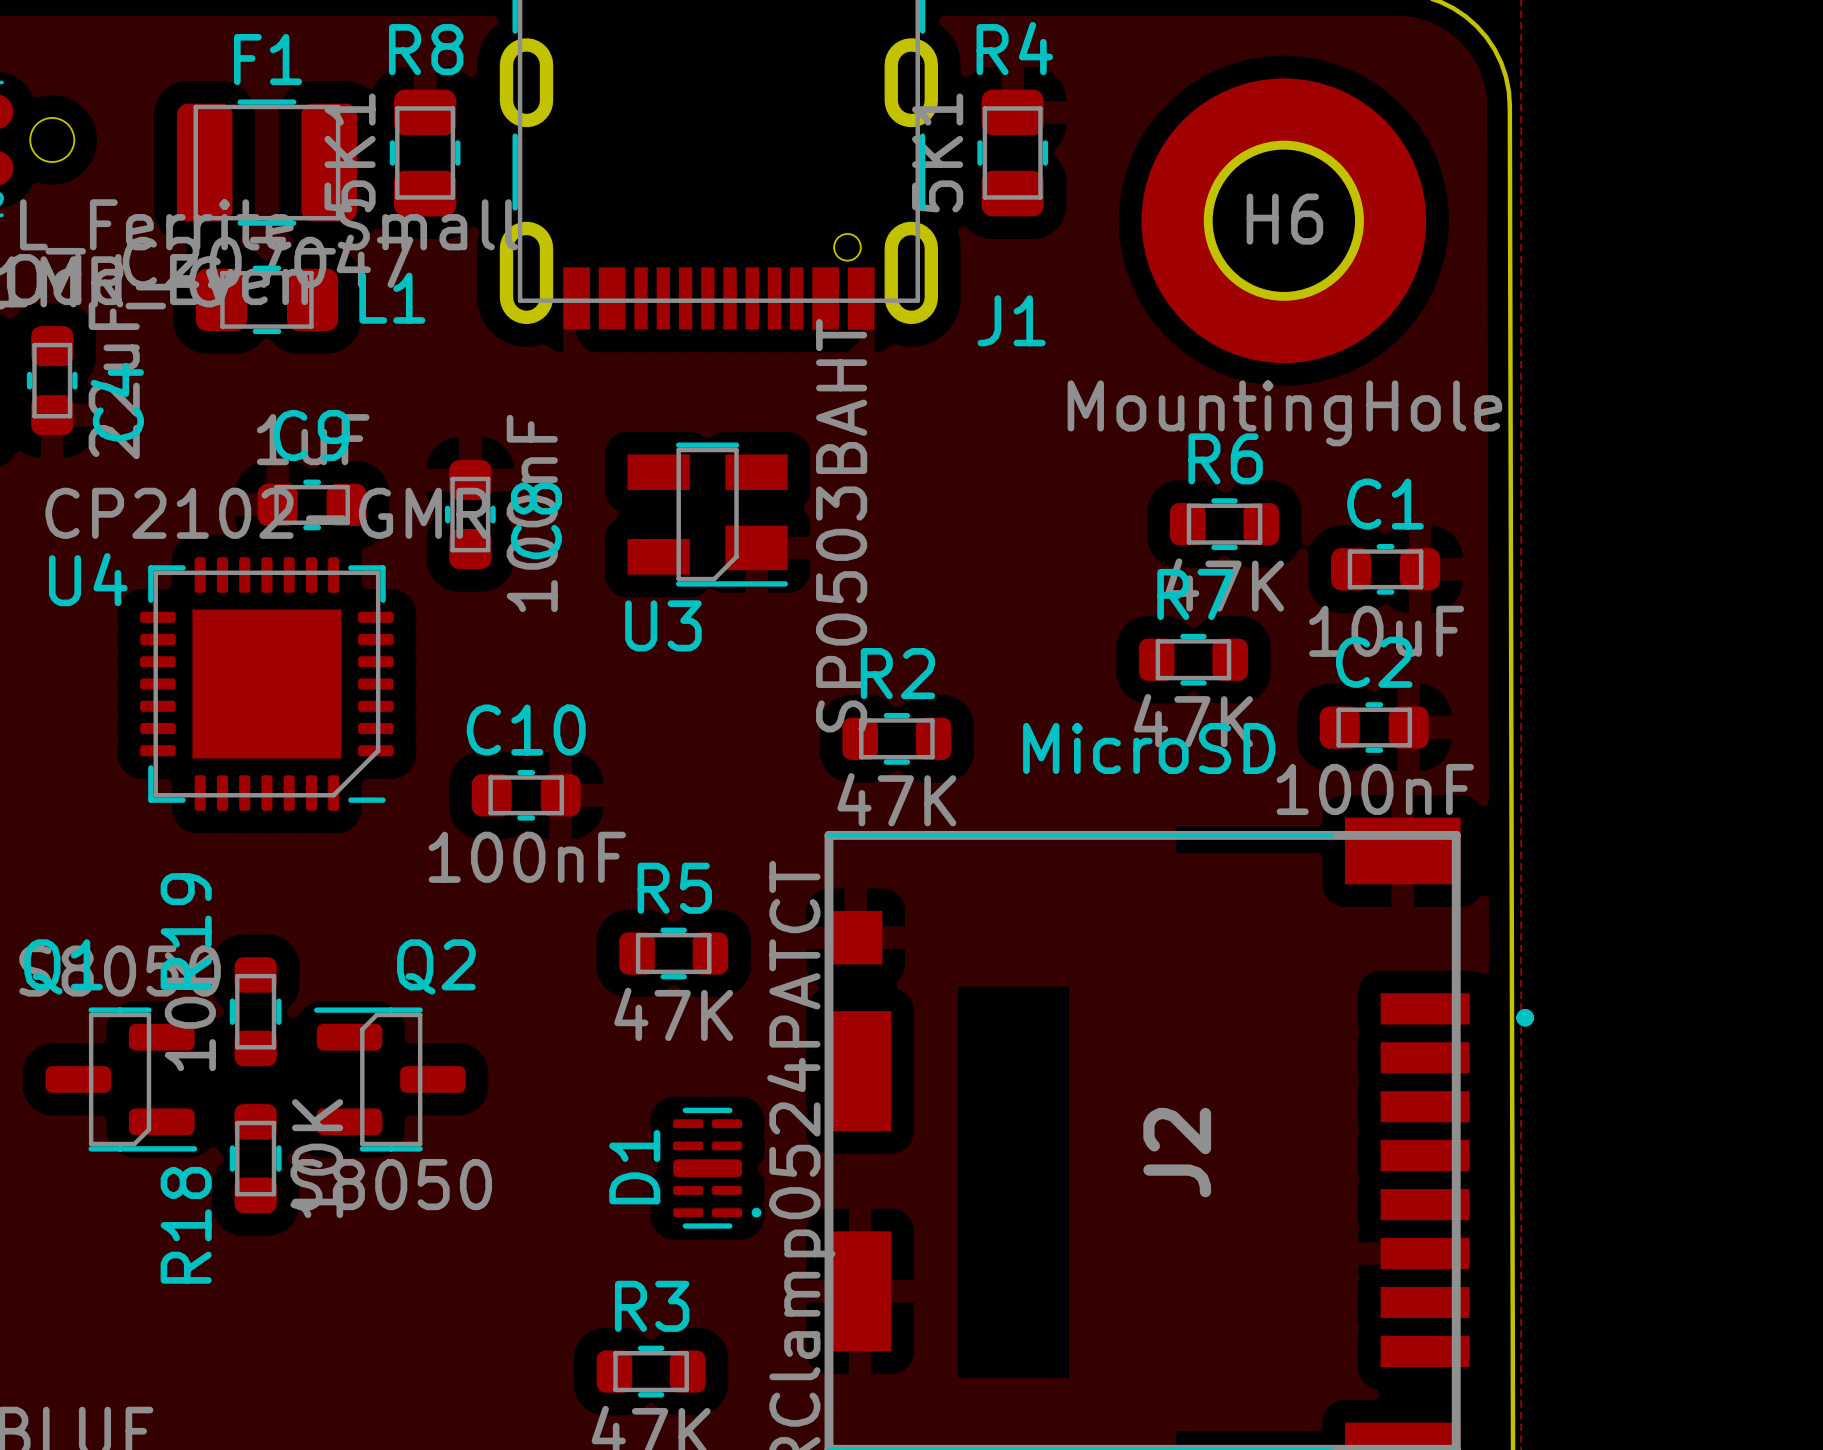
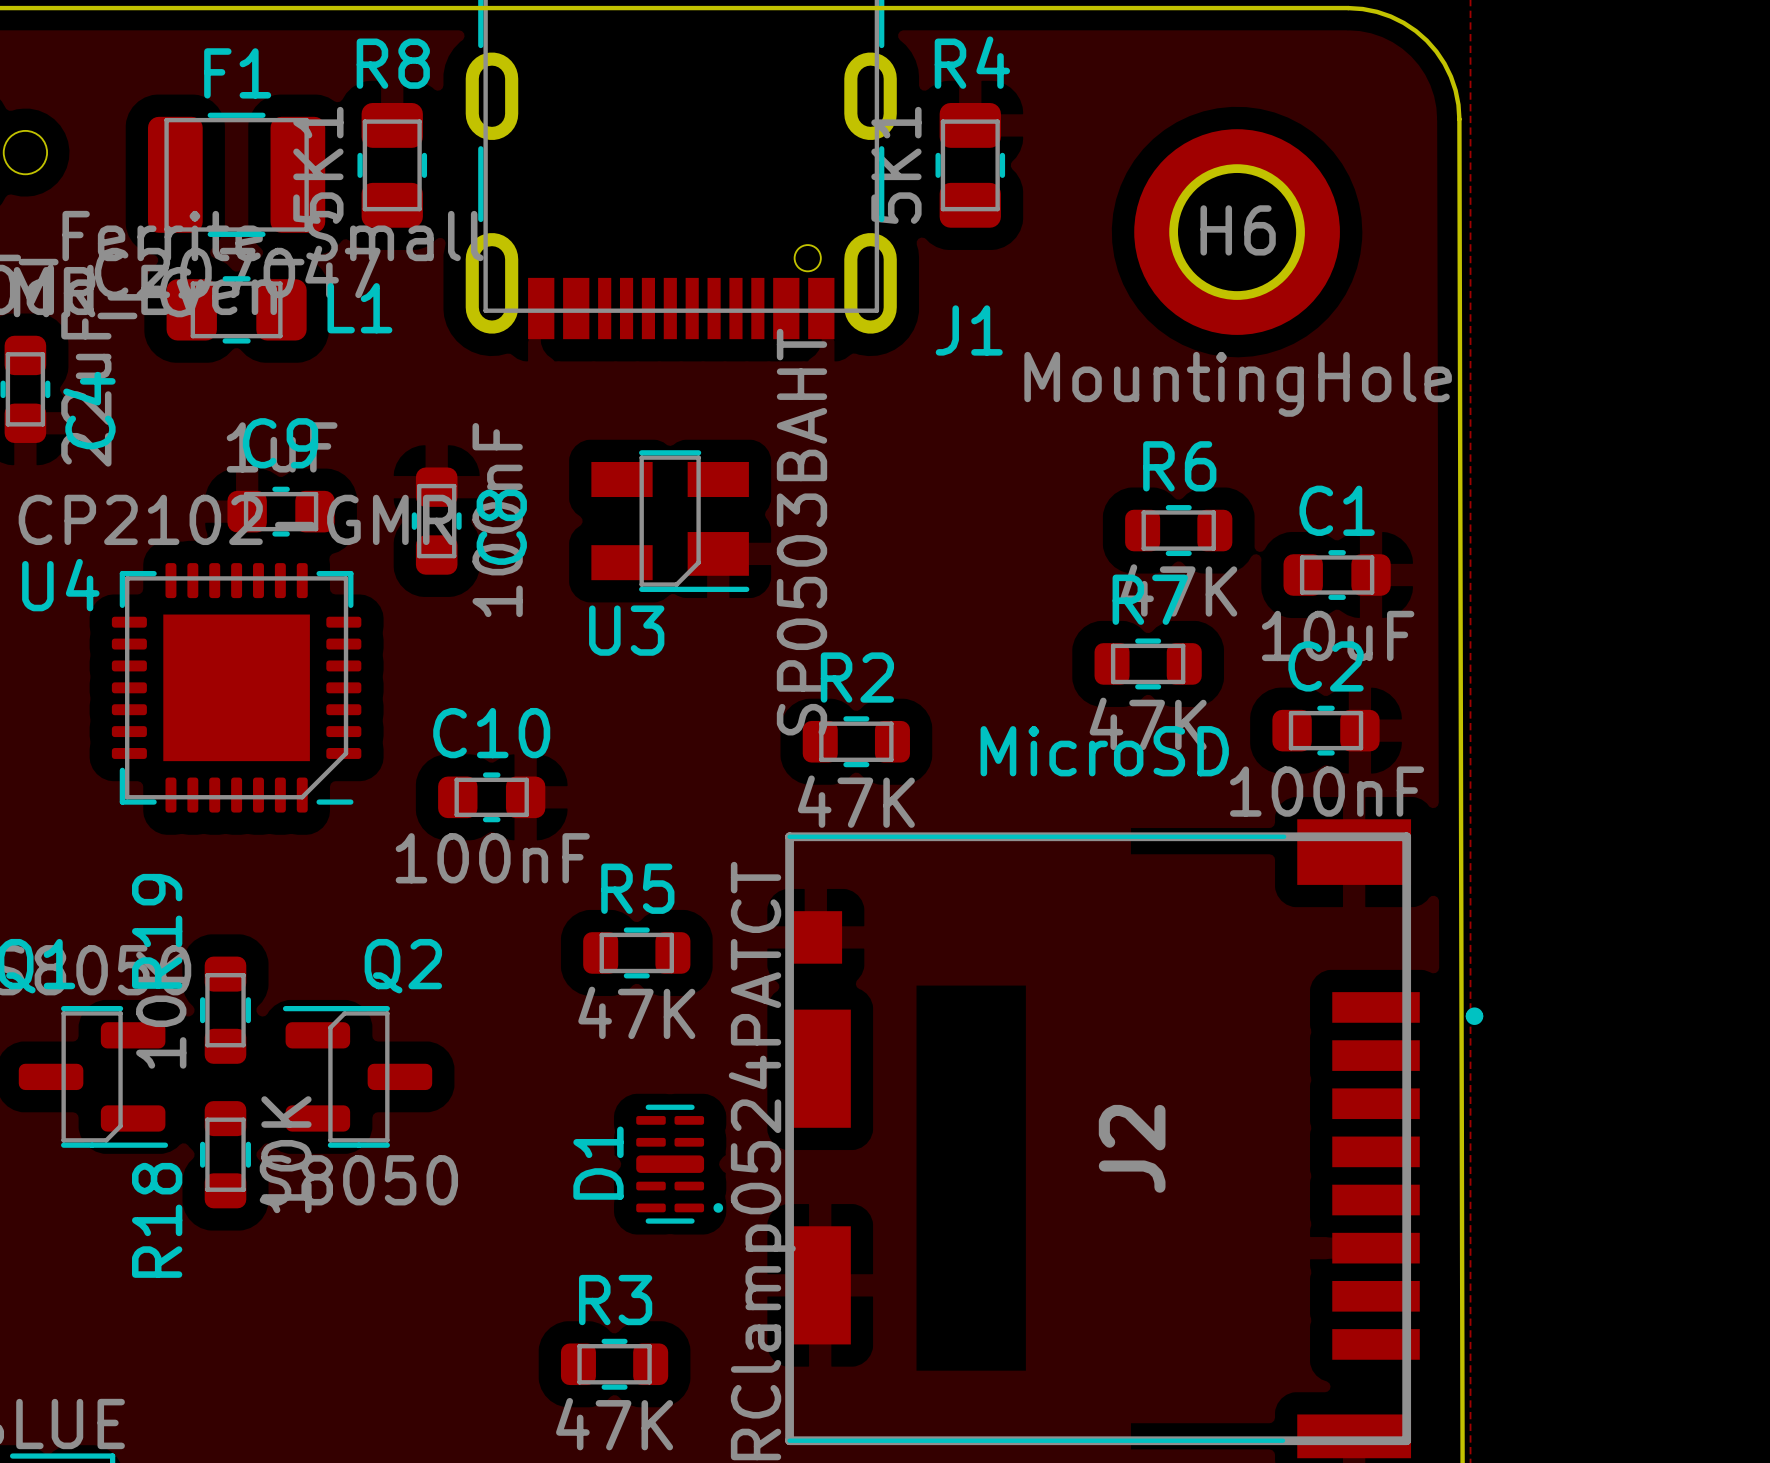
H6 footprint: [1141, 78, 1427, 364] -> [1134, 129, 1340, 335]
H6 value position: MountingHole (1284, 413) -> MountingHole (1238, 384)

